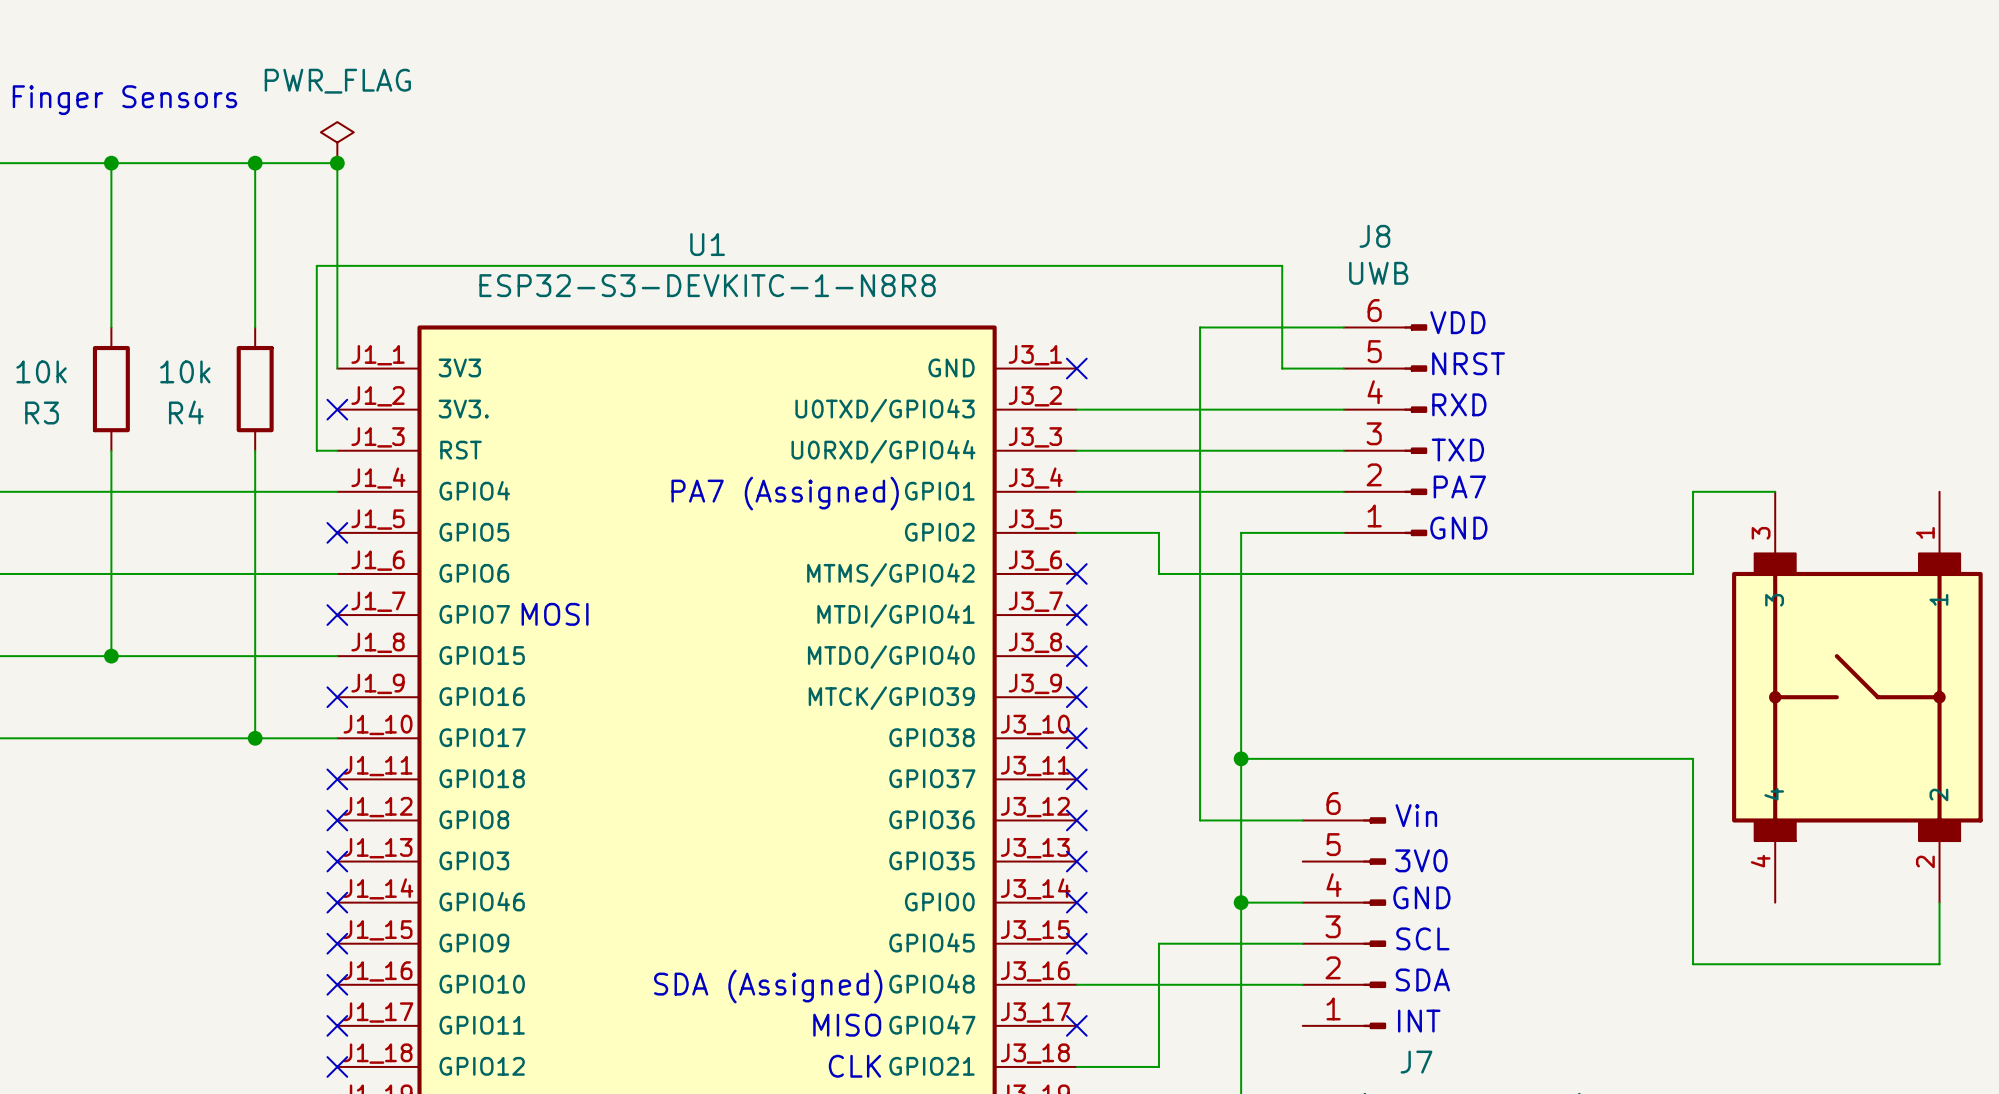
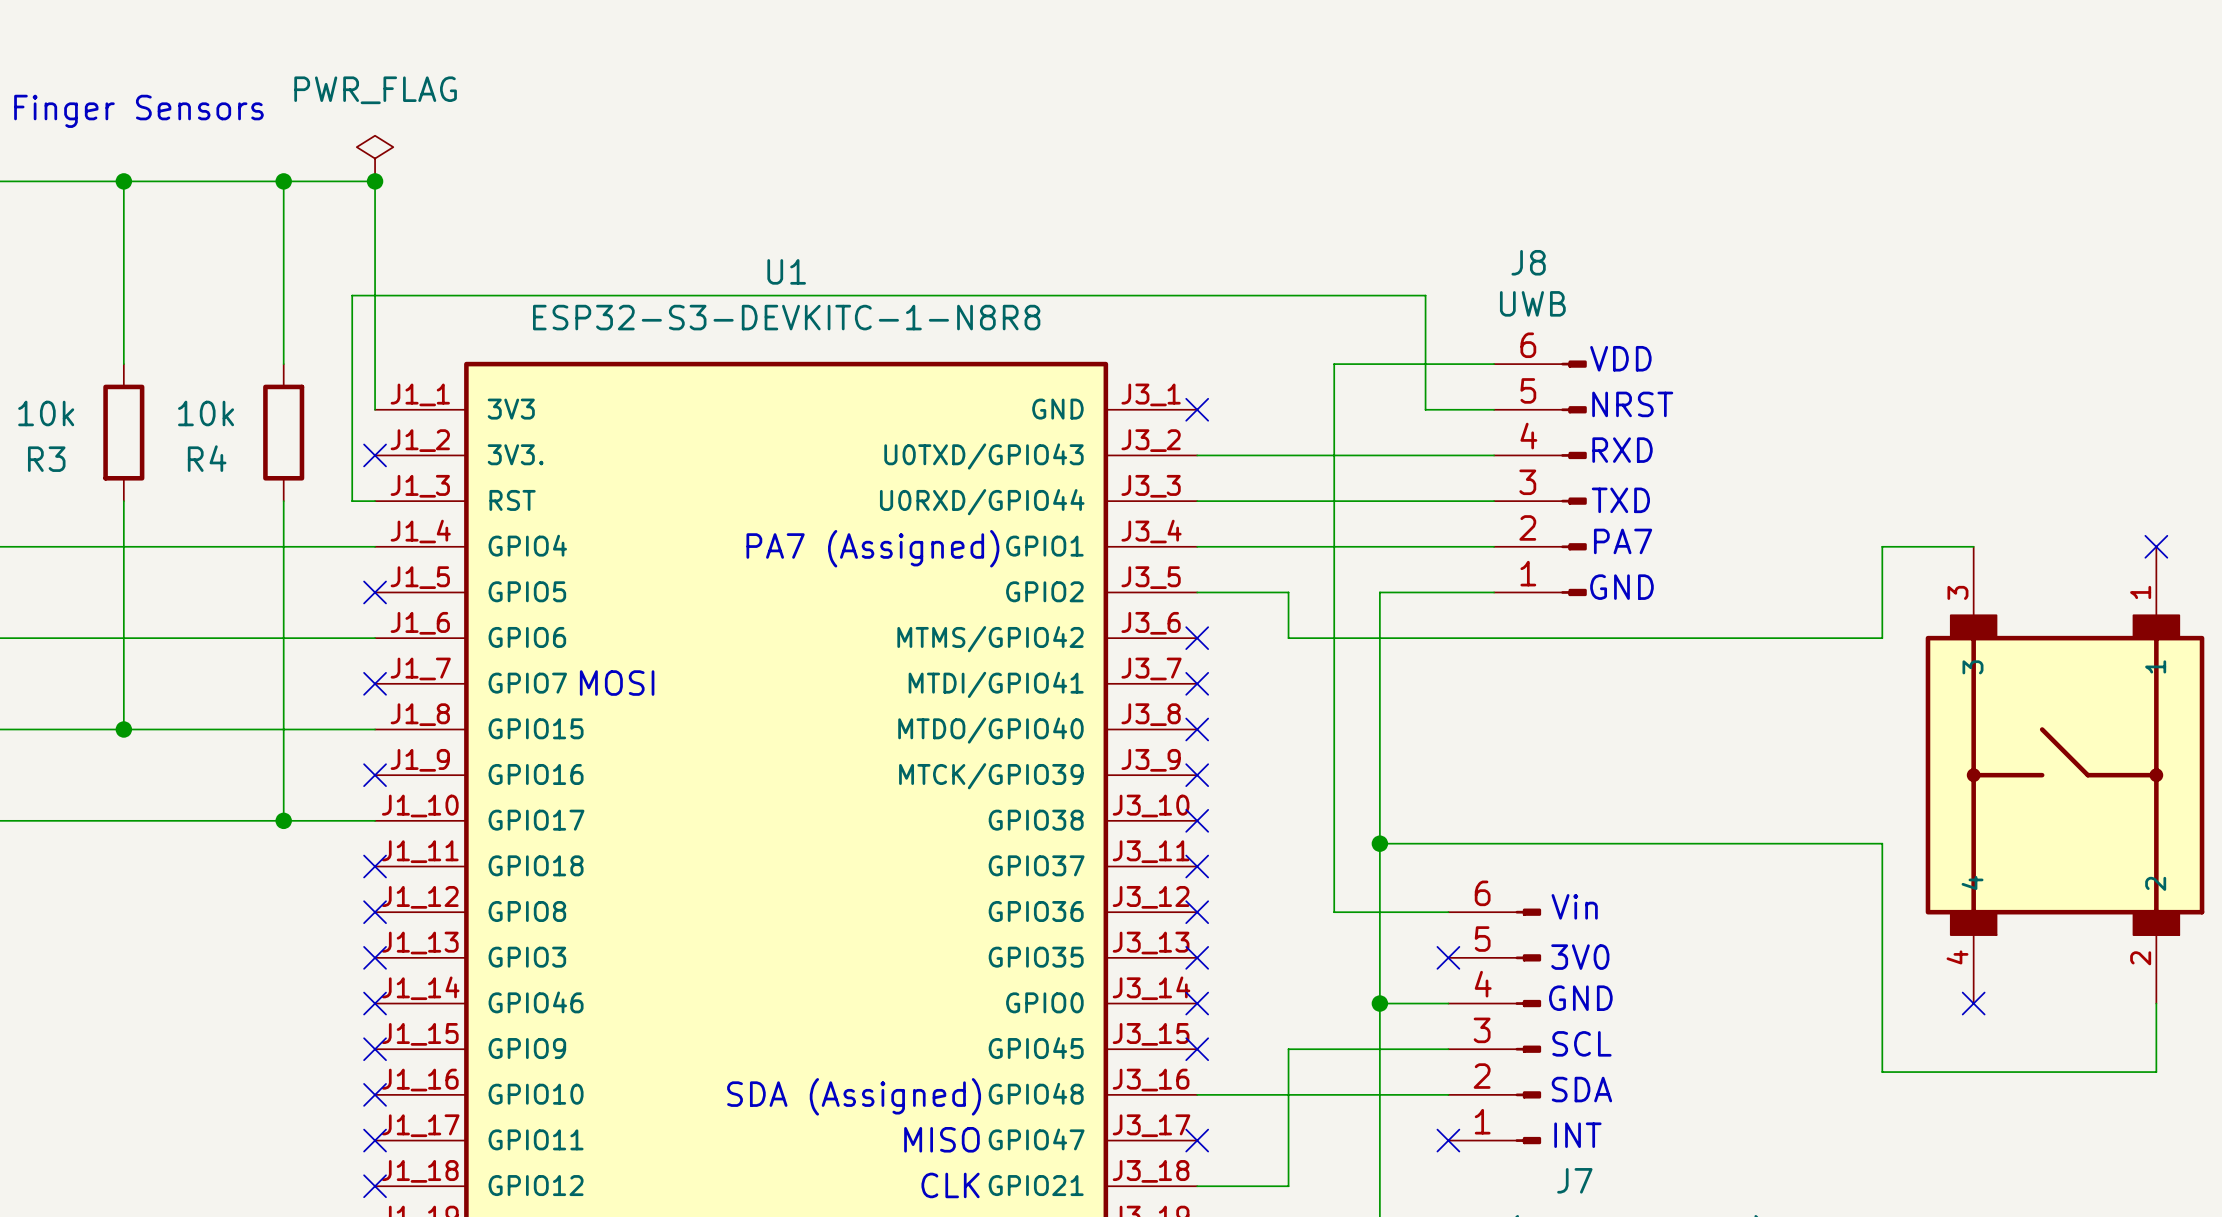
no-connect mark: none -> (2156, 546)
no-connect mark: none -> (1448, 957)
no-connect mark: none -> (1973, 1003)
no-connect mark: none -> (1448, 1140)

